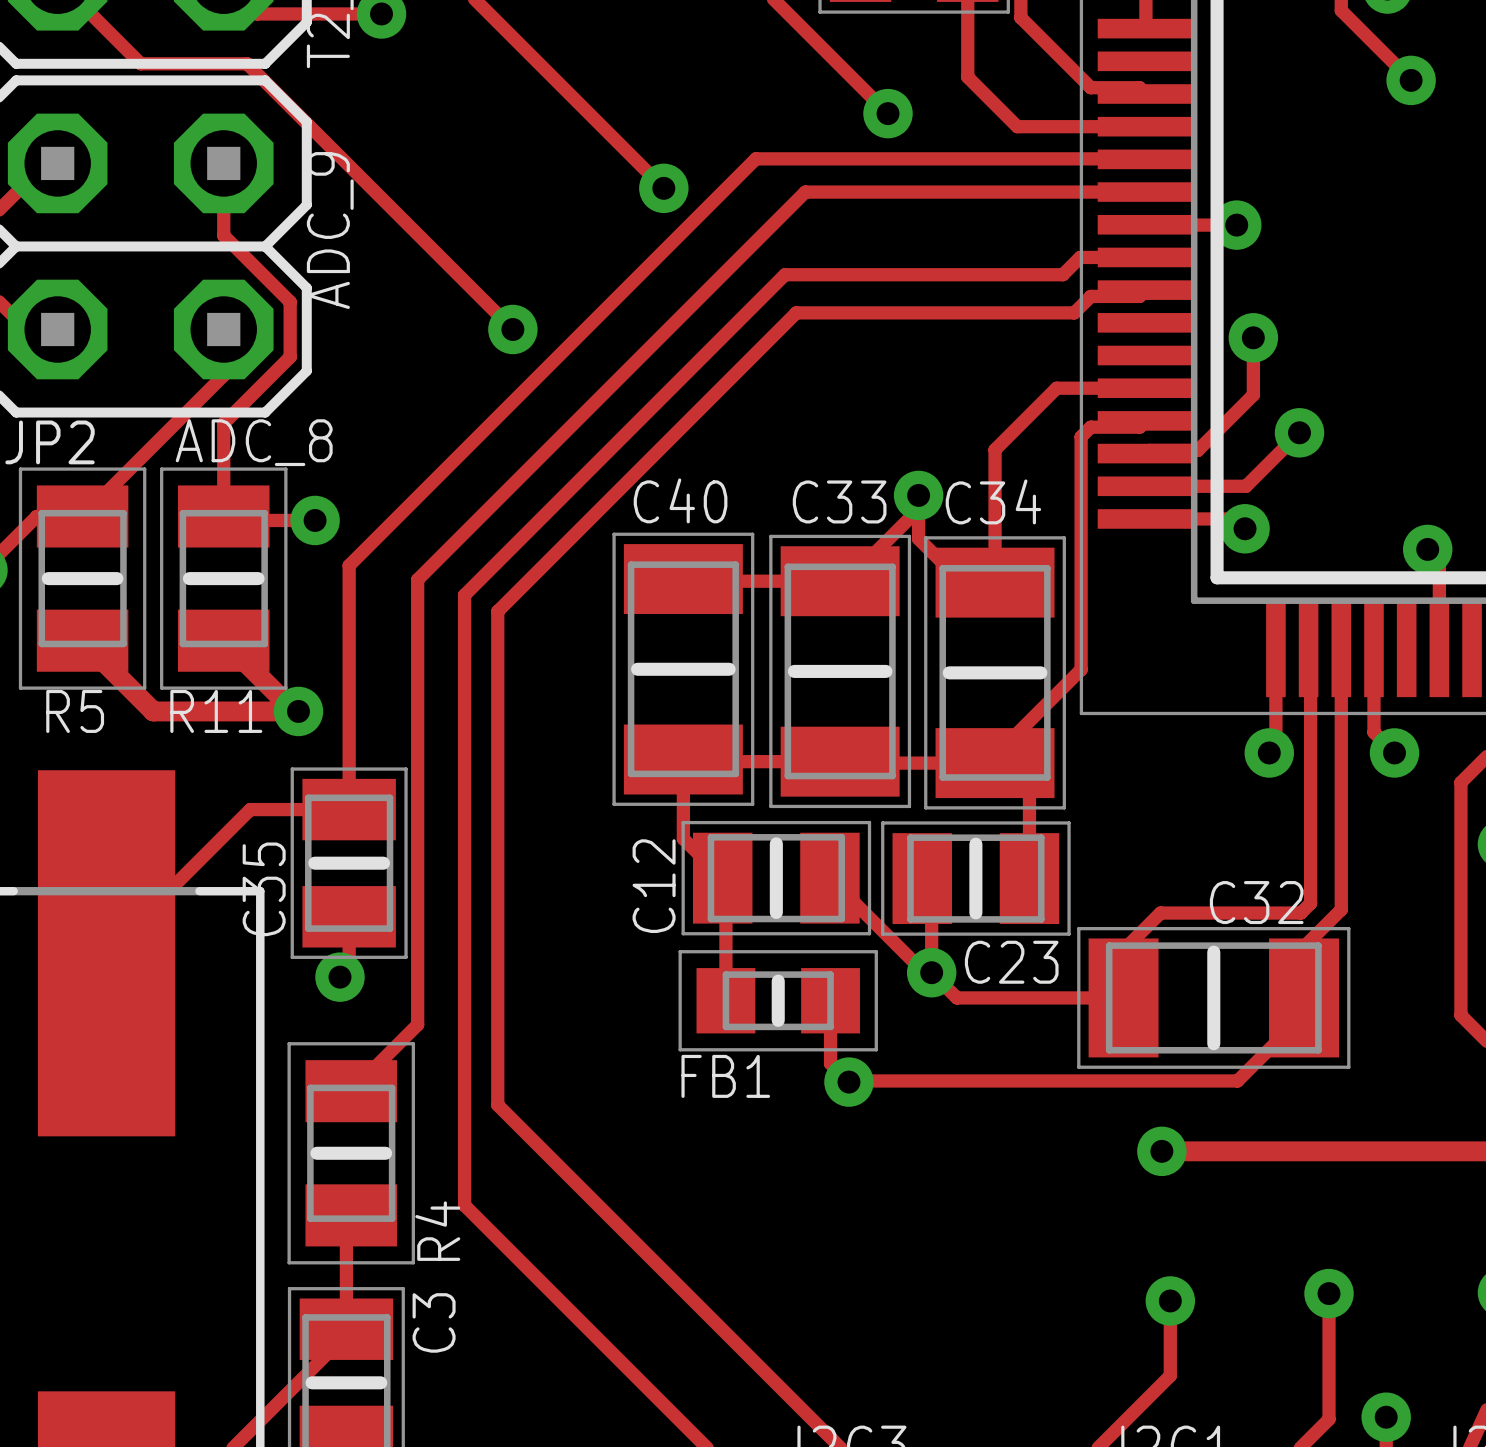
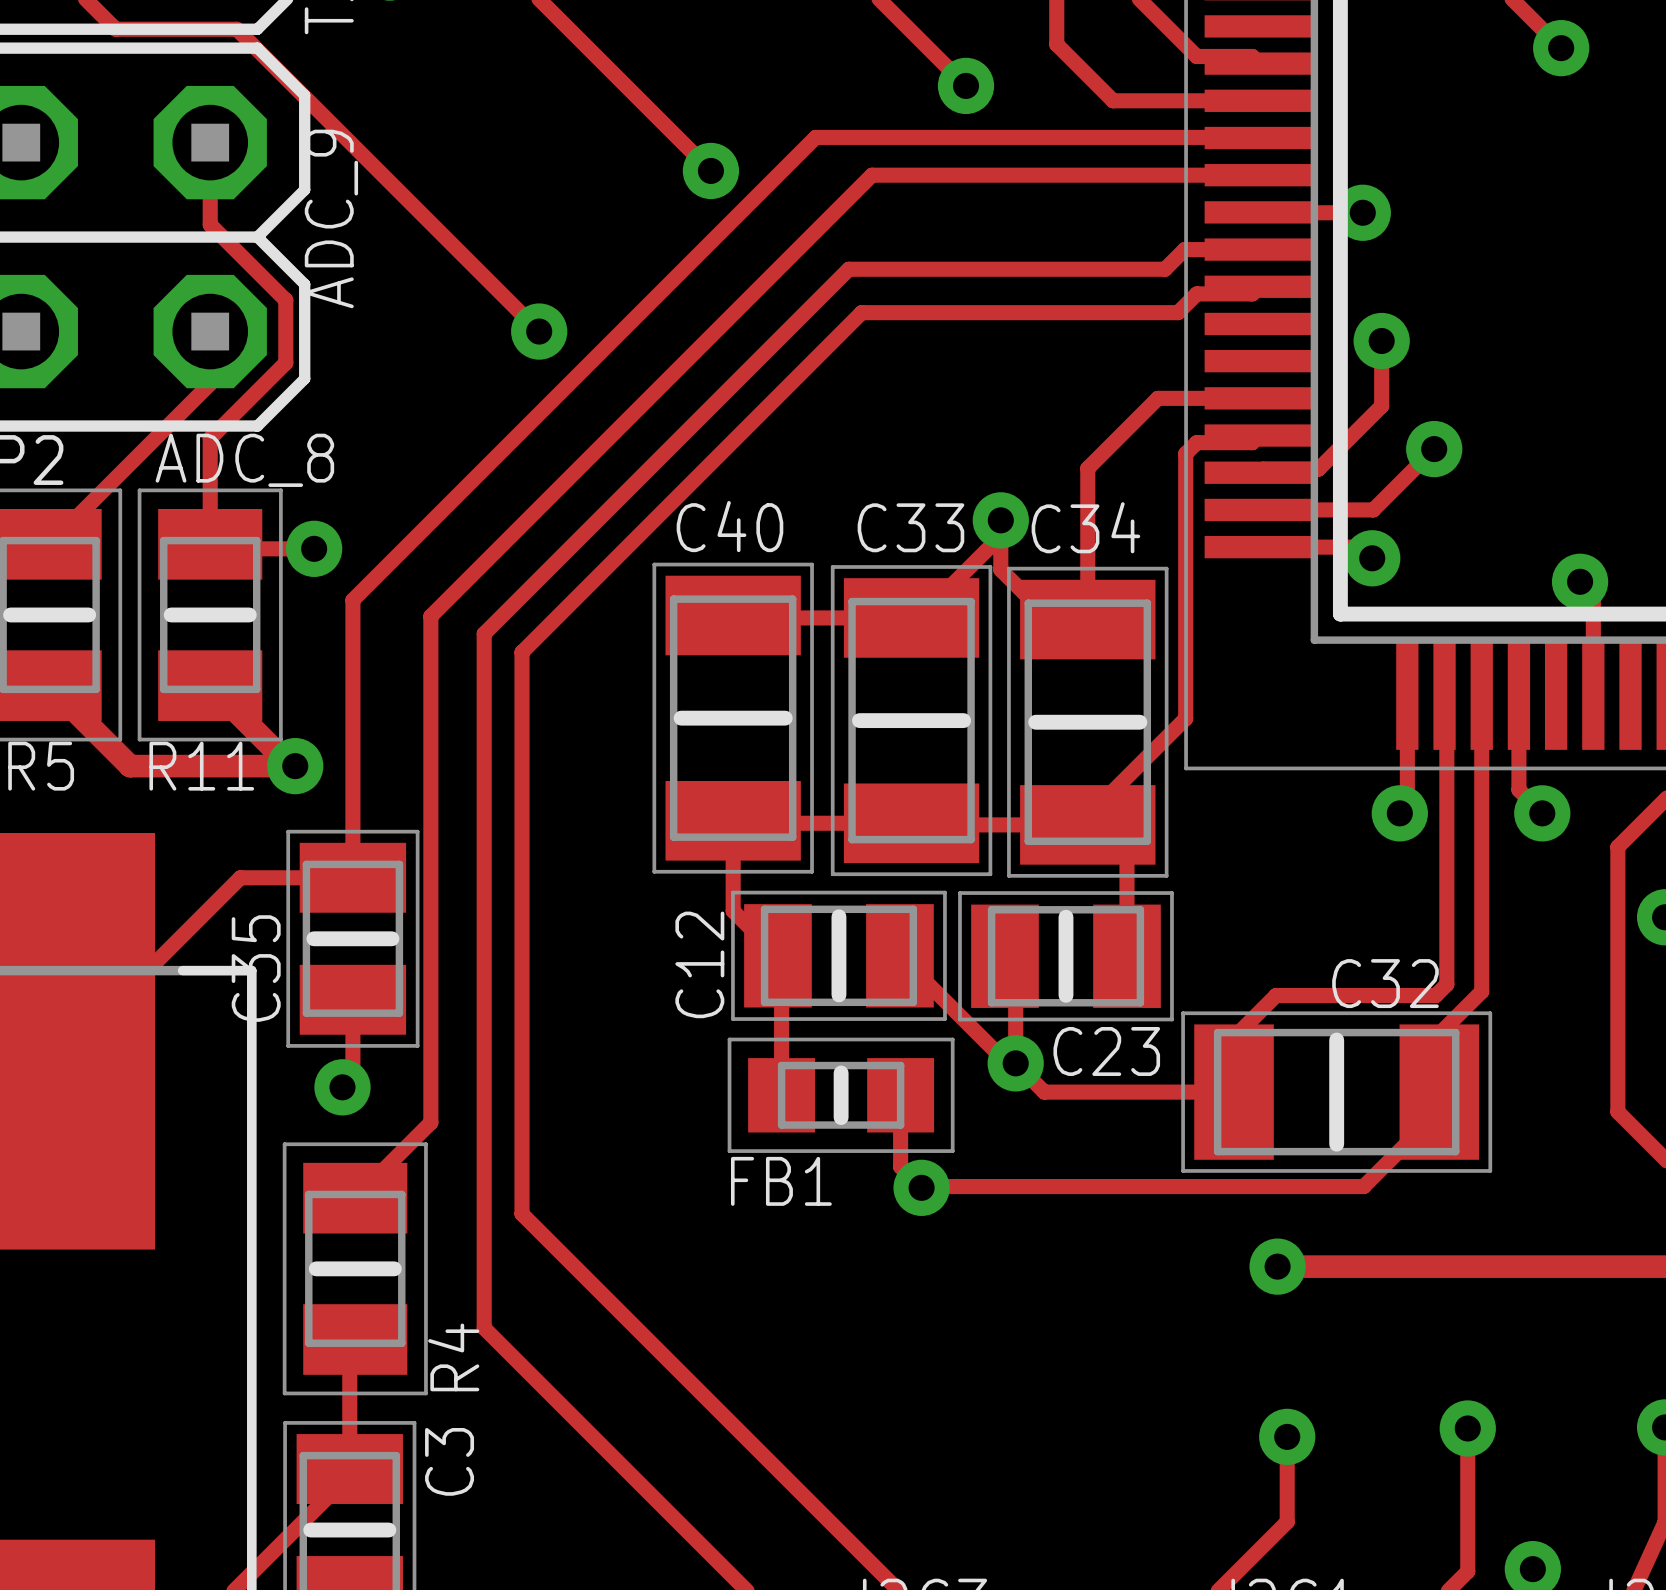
via position: (340, 977) -> (342, 1087)

